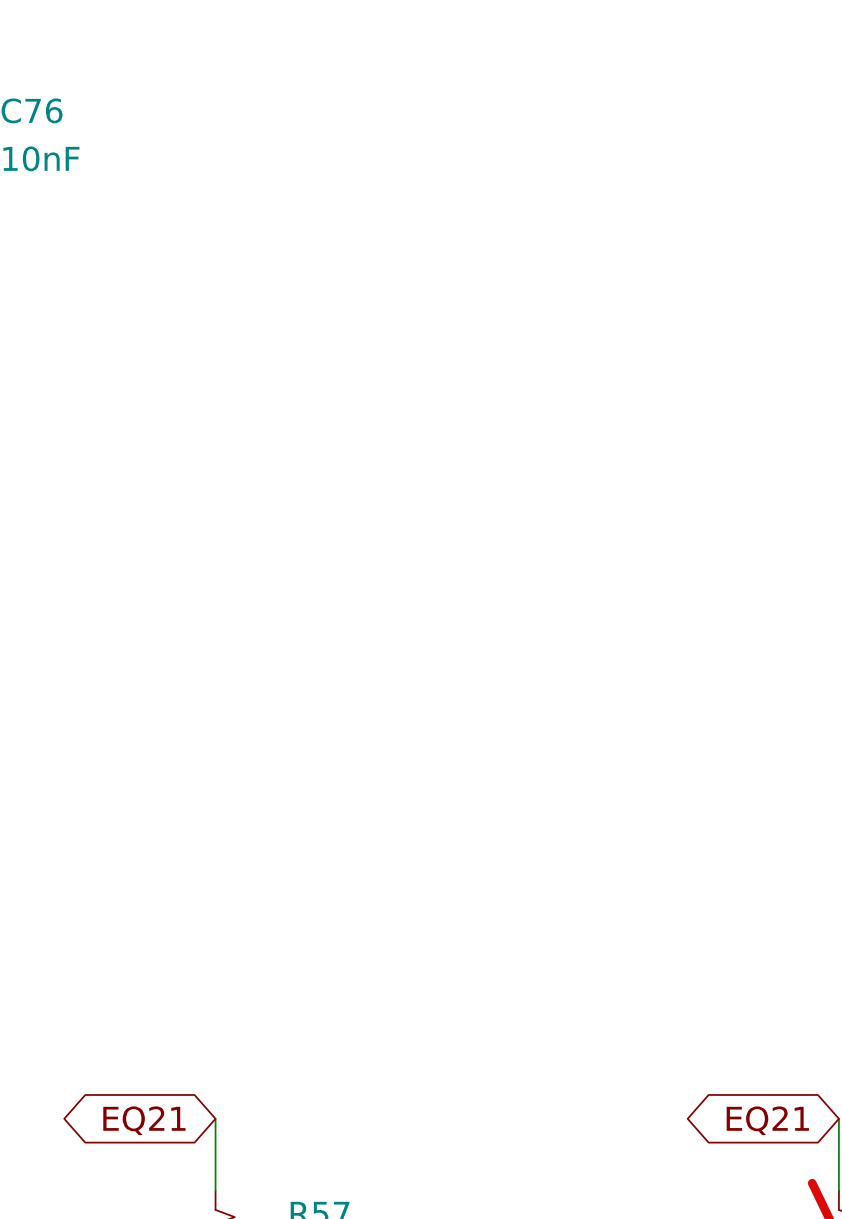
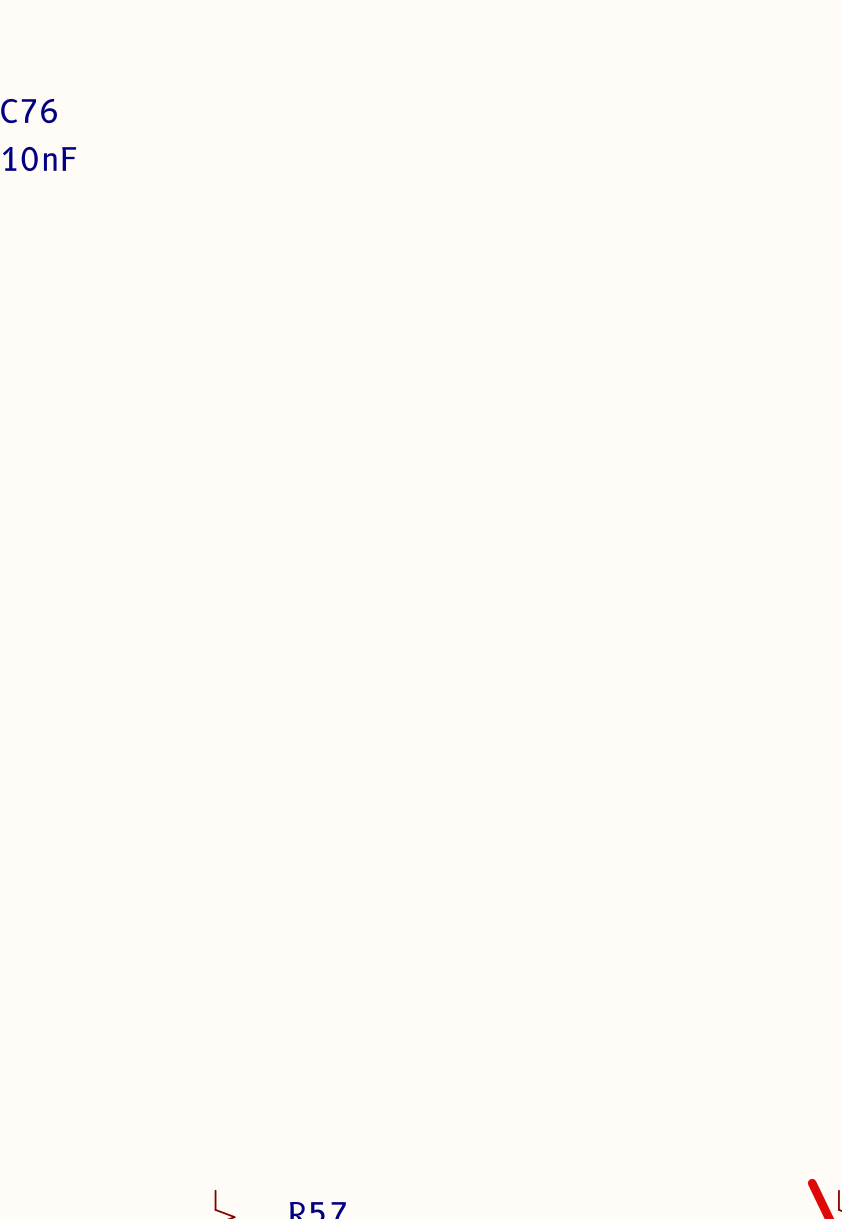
wire: (215, 1118) (215, 1190) -> none
wire: (838, 1118) (838, 1190) -> none
global label: EQ21 (144, 1120) -> none
global label: EQ21 (767, 1120) -> none

